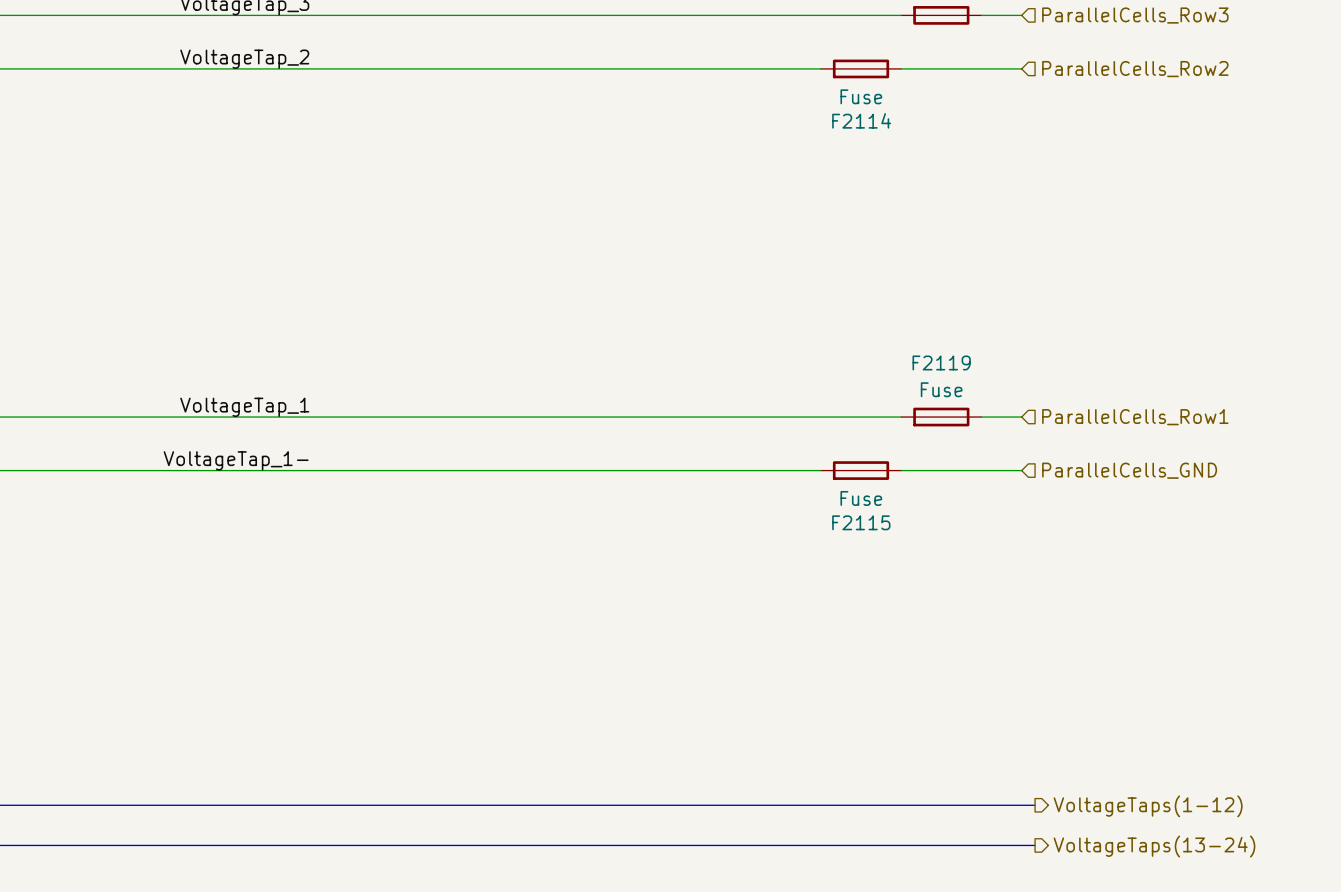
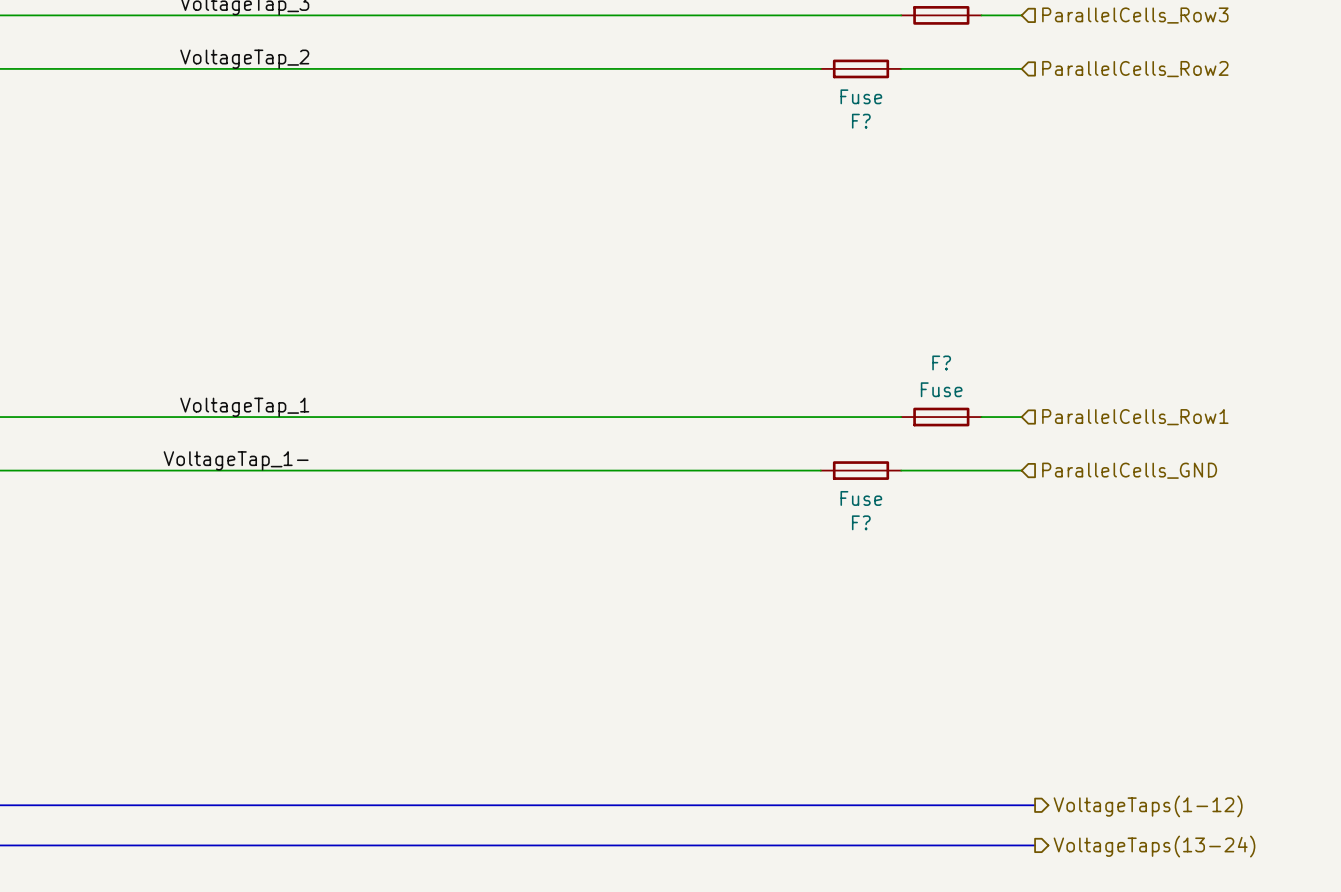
F2114 name: F2114 (861, 120) -> F? (861, 121)
F2119 name: F2119 (941, 362) -> F? (941, 362)
F2115 name: F2115 (861, 522) -> F? (861, 522)

